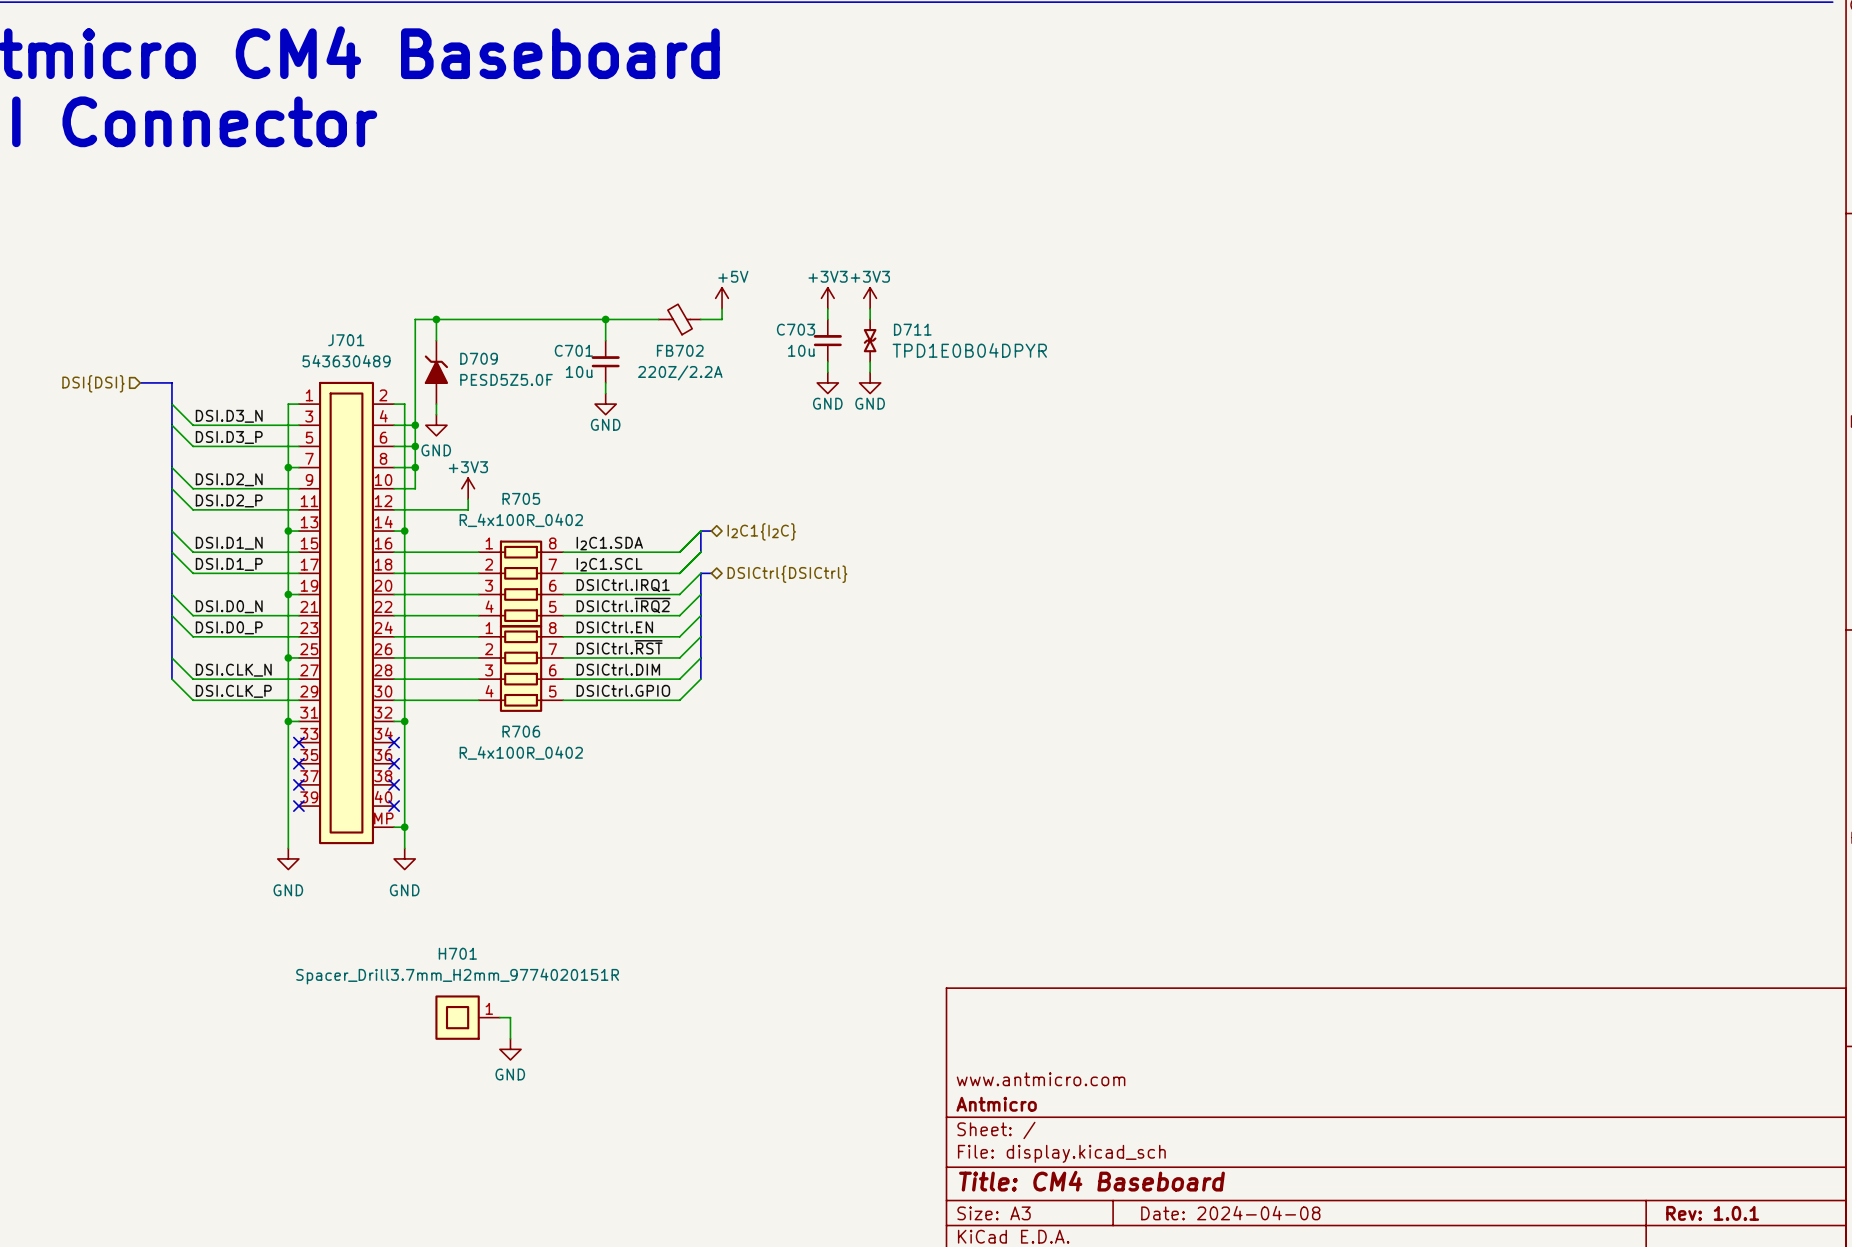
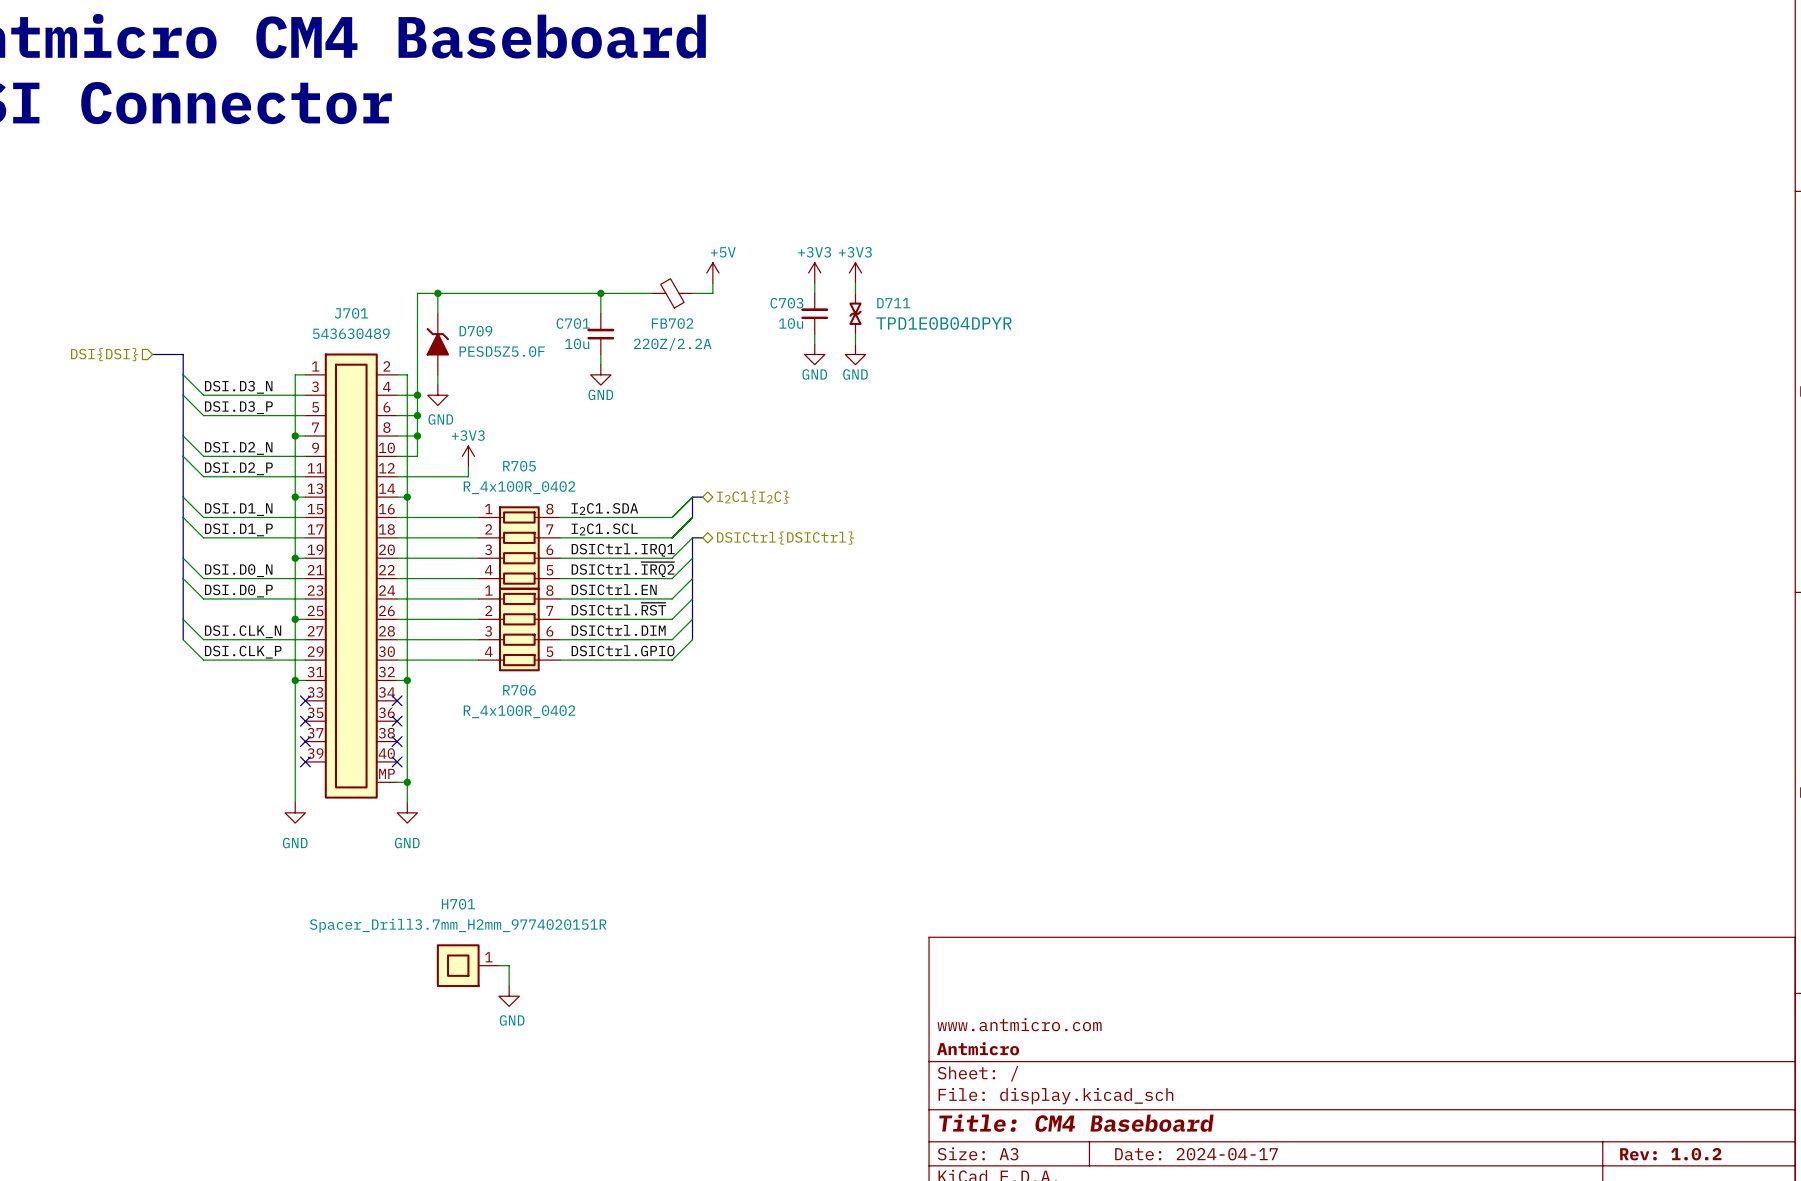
title block: Date: 2024-04-08 (1230, 1213) -> Date: 2024-04-17 (1196, 1154)
title block: Rev: 1.0.1 (1712, 1213) -> Rev: 1.0.2 (1670, 1154)

